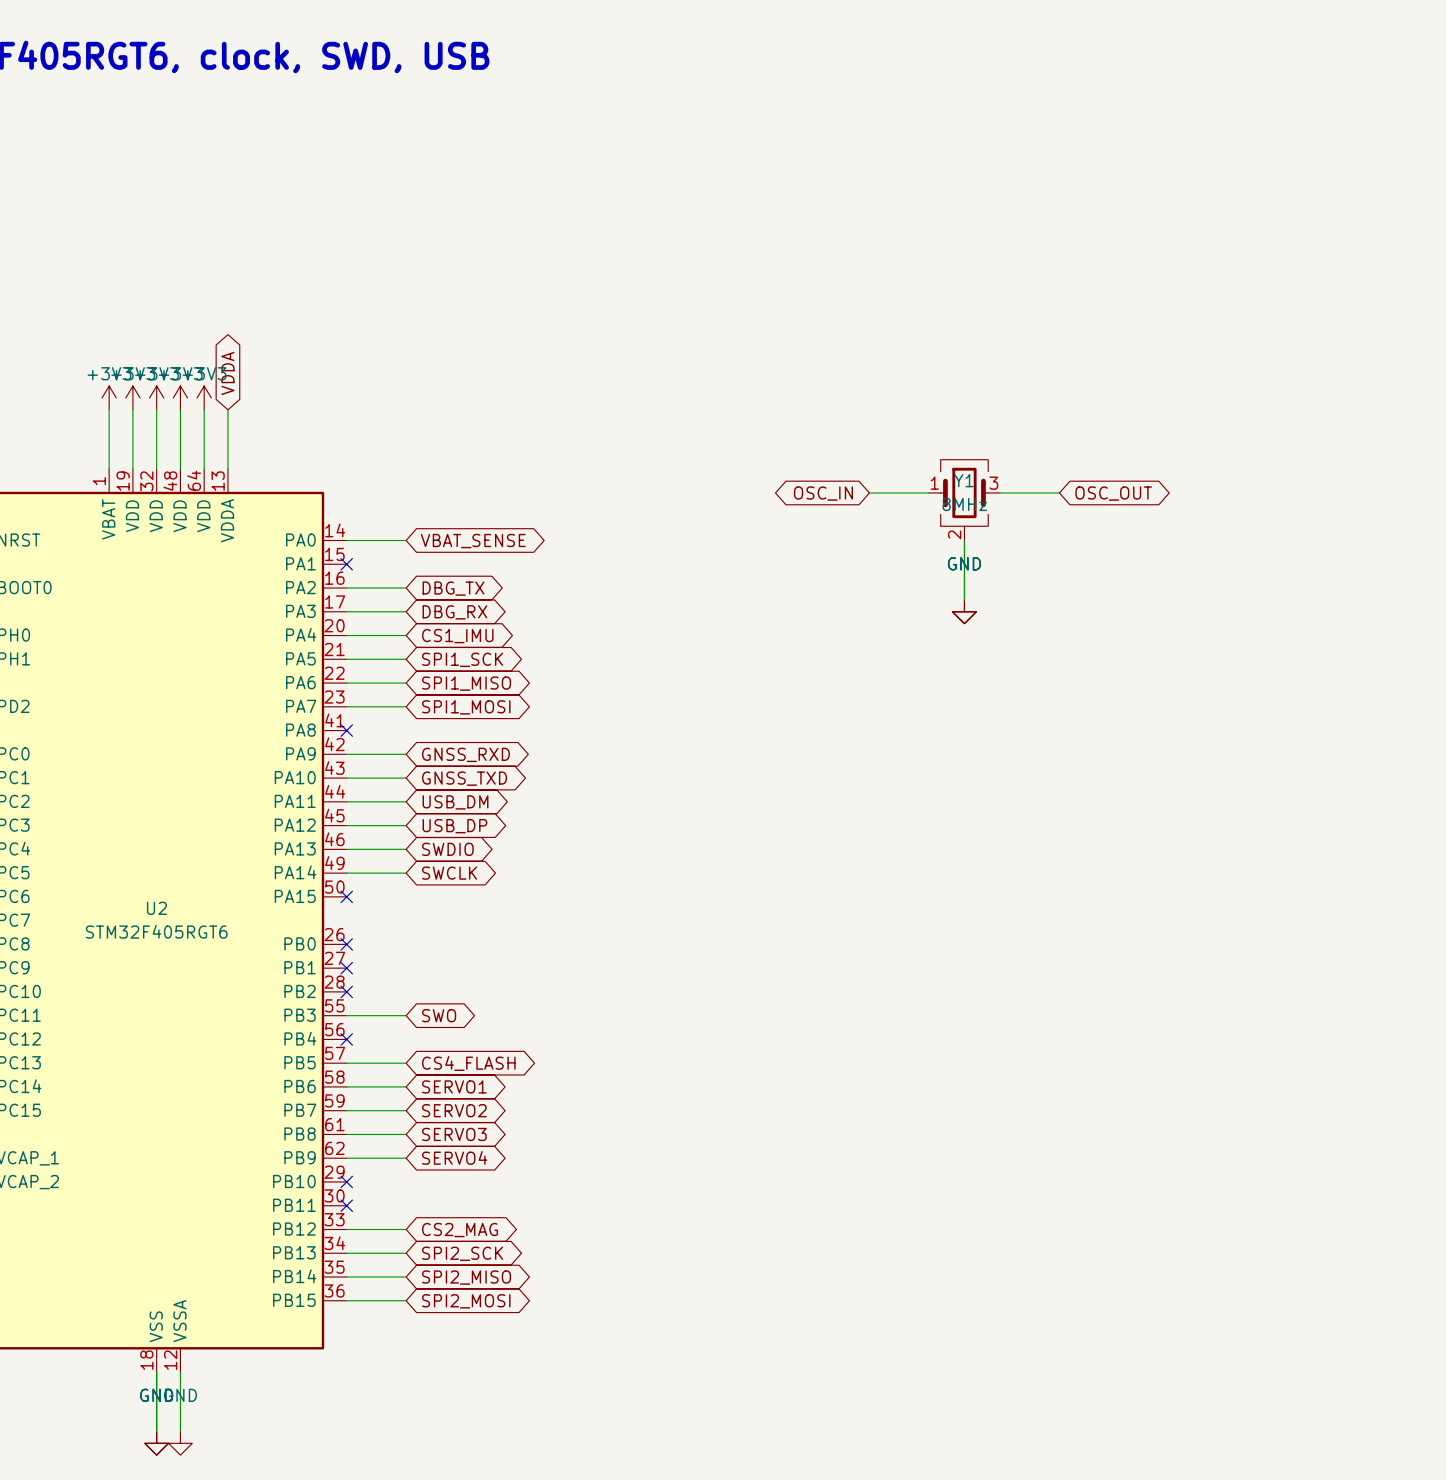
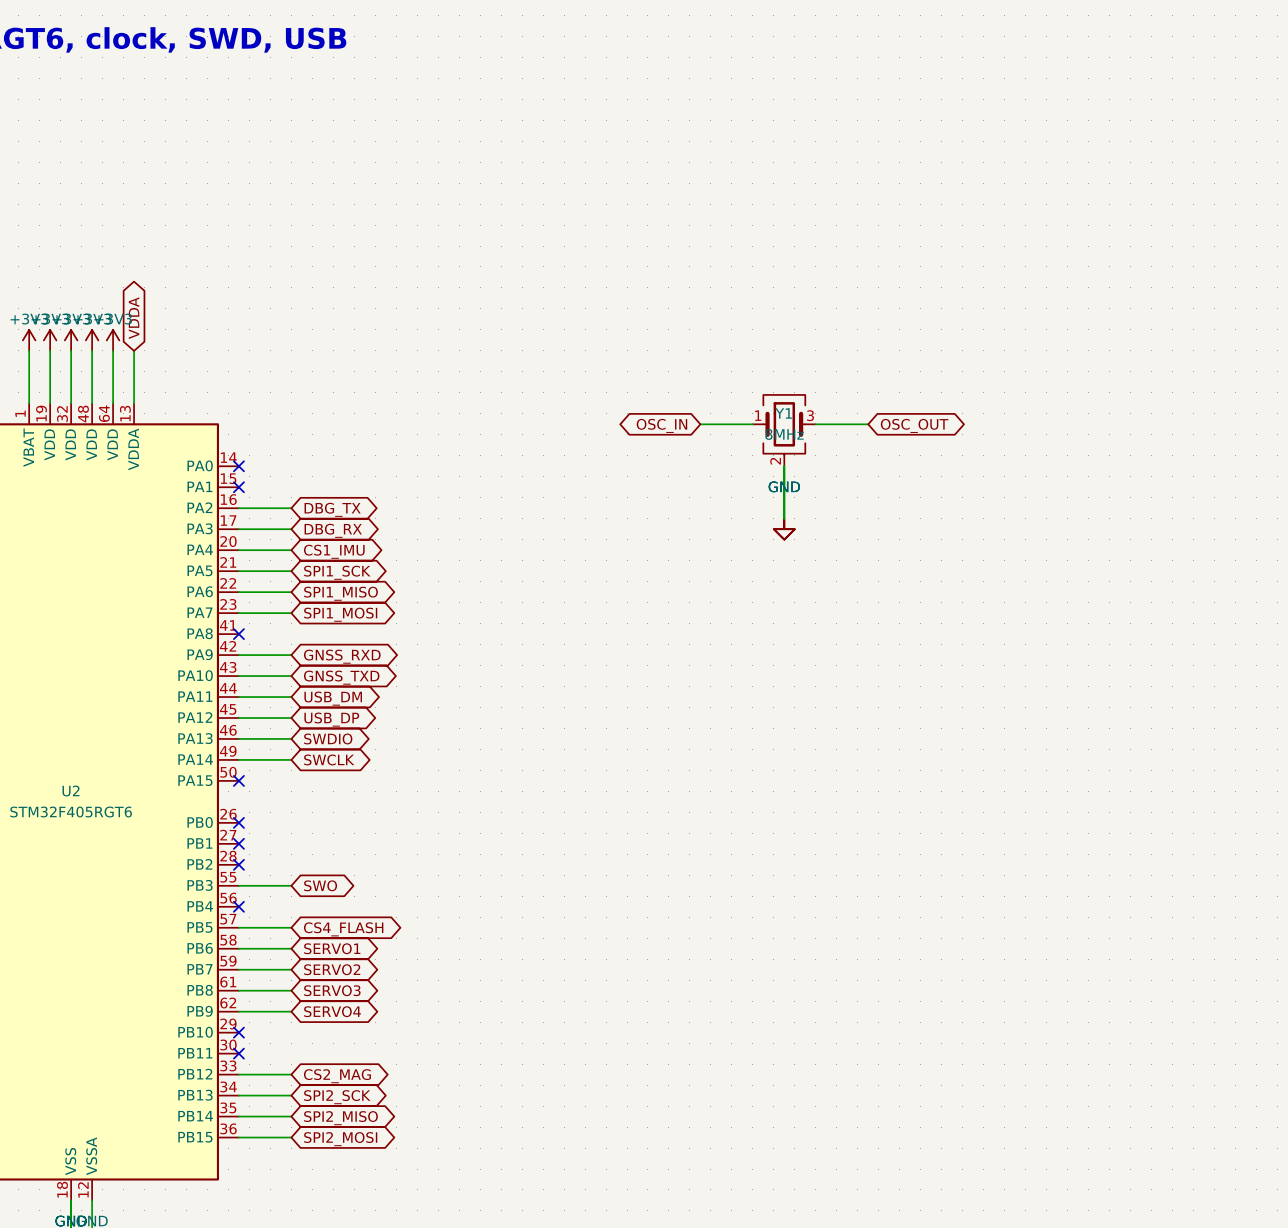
wire: (346, 540) (406, 540) -> none
no-connect mark: none -> (238, 466)
global label: VBAT_SENSE (473, 541) -> none

